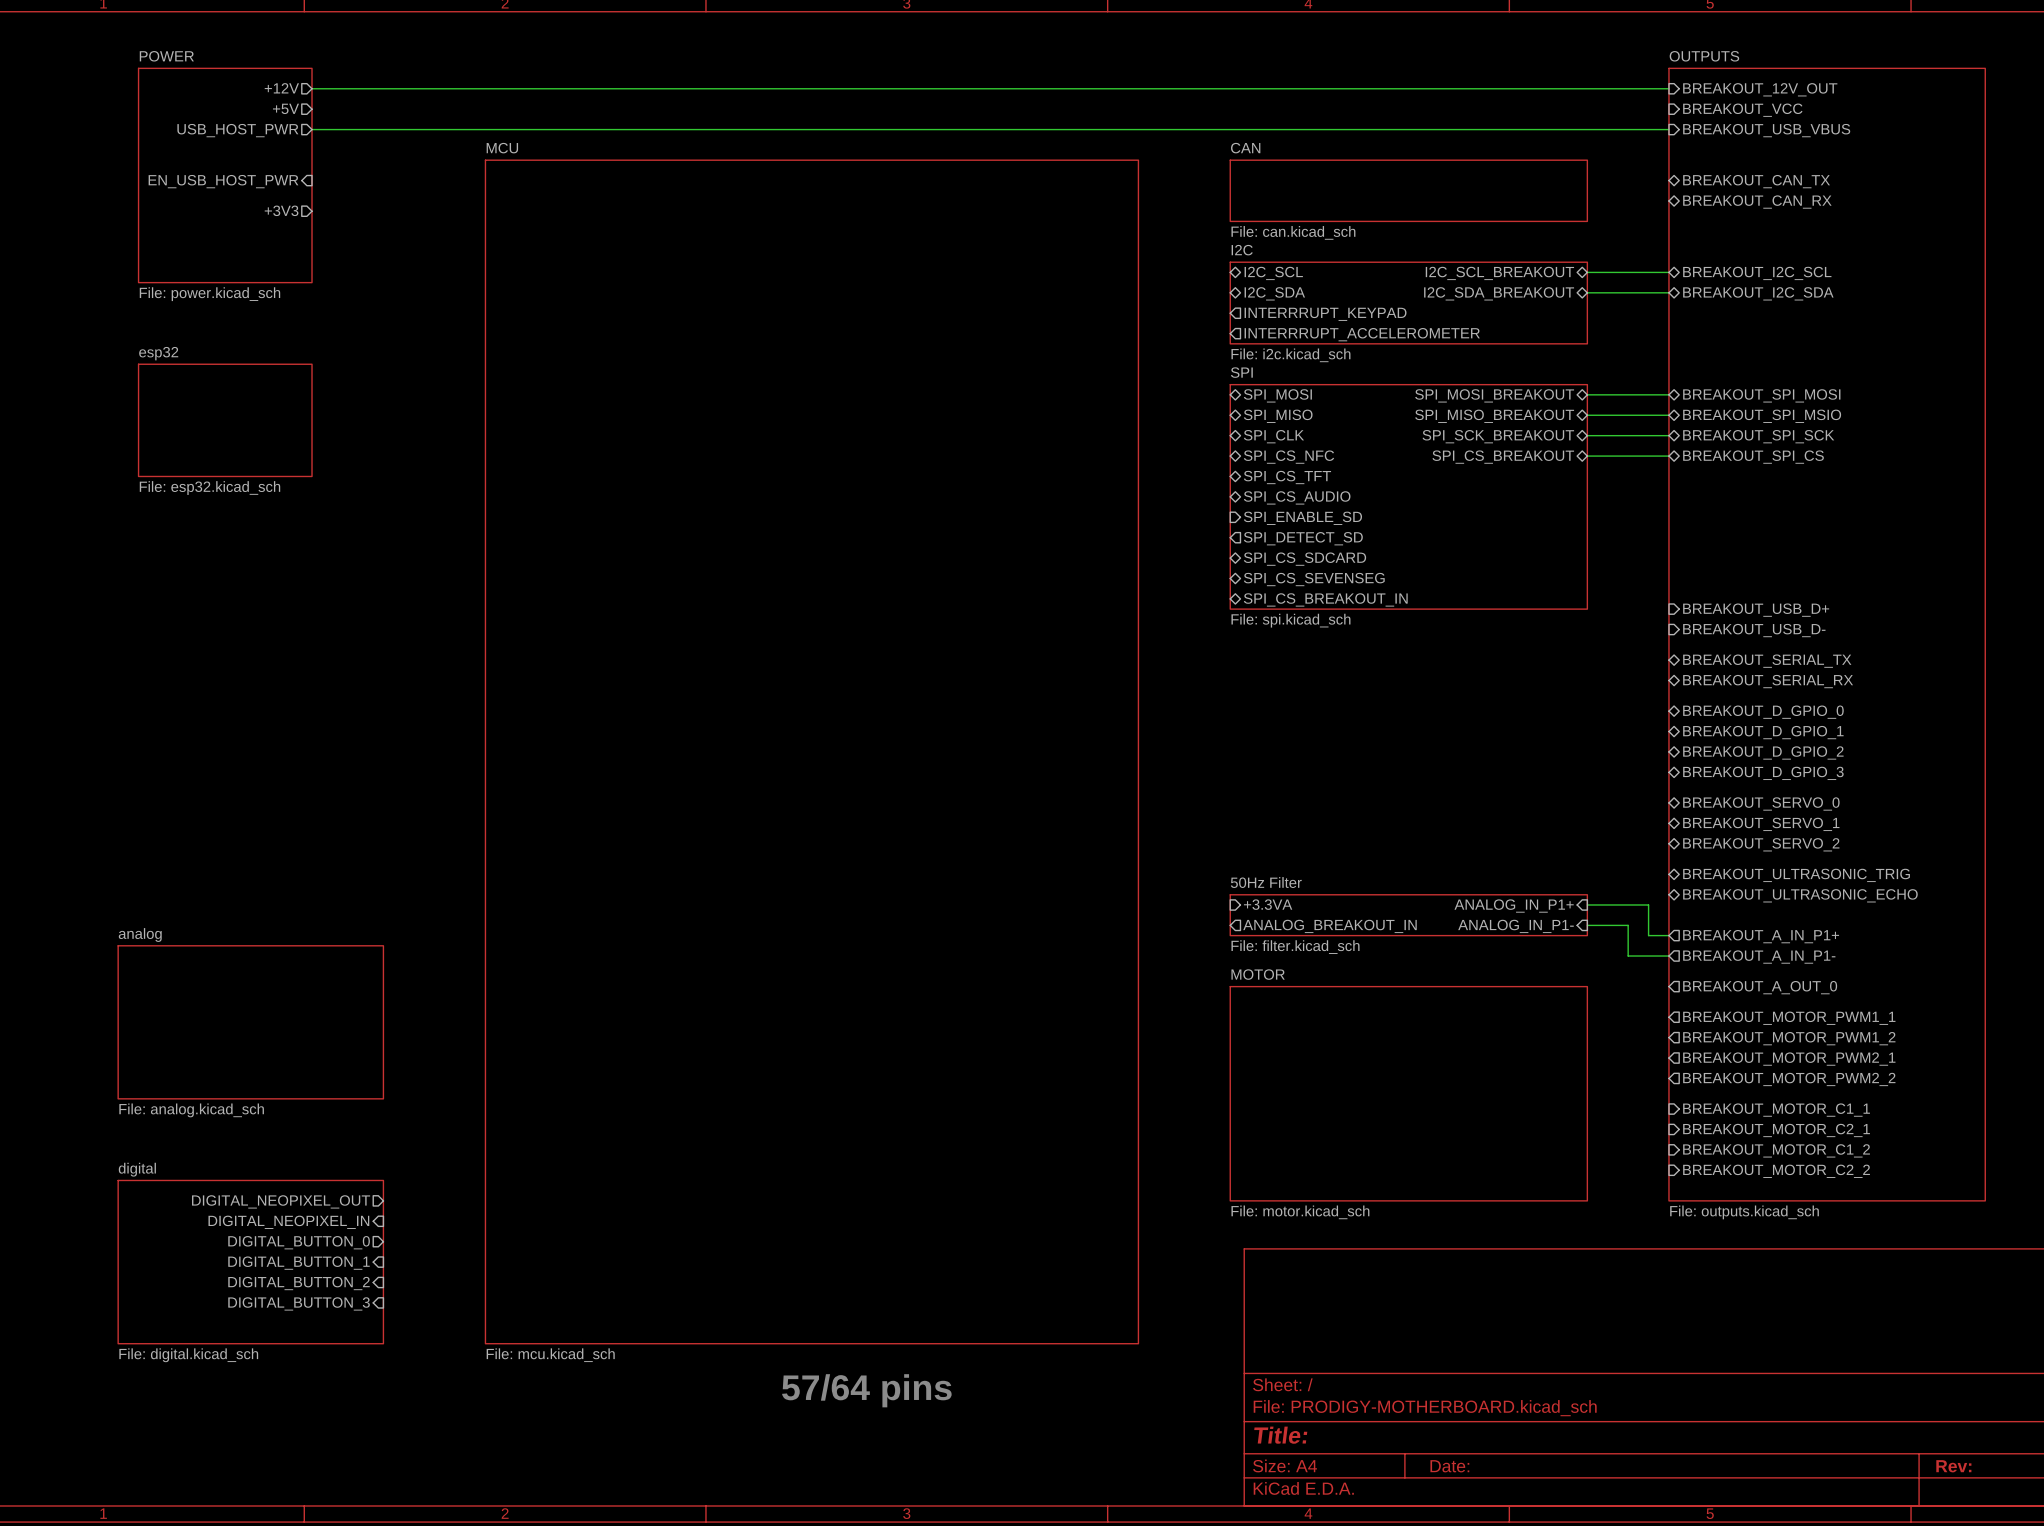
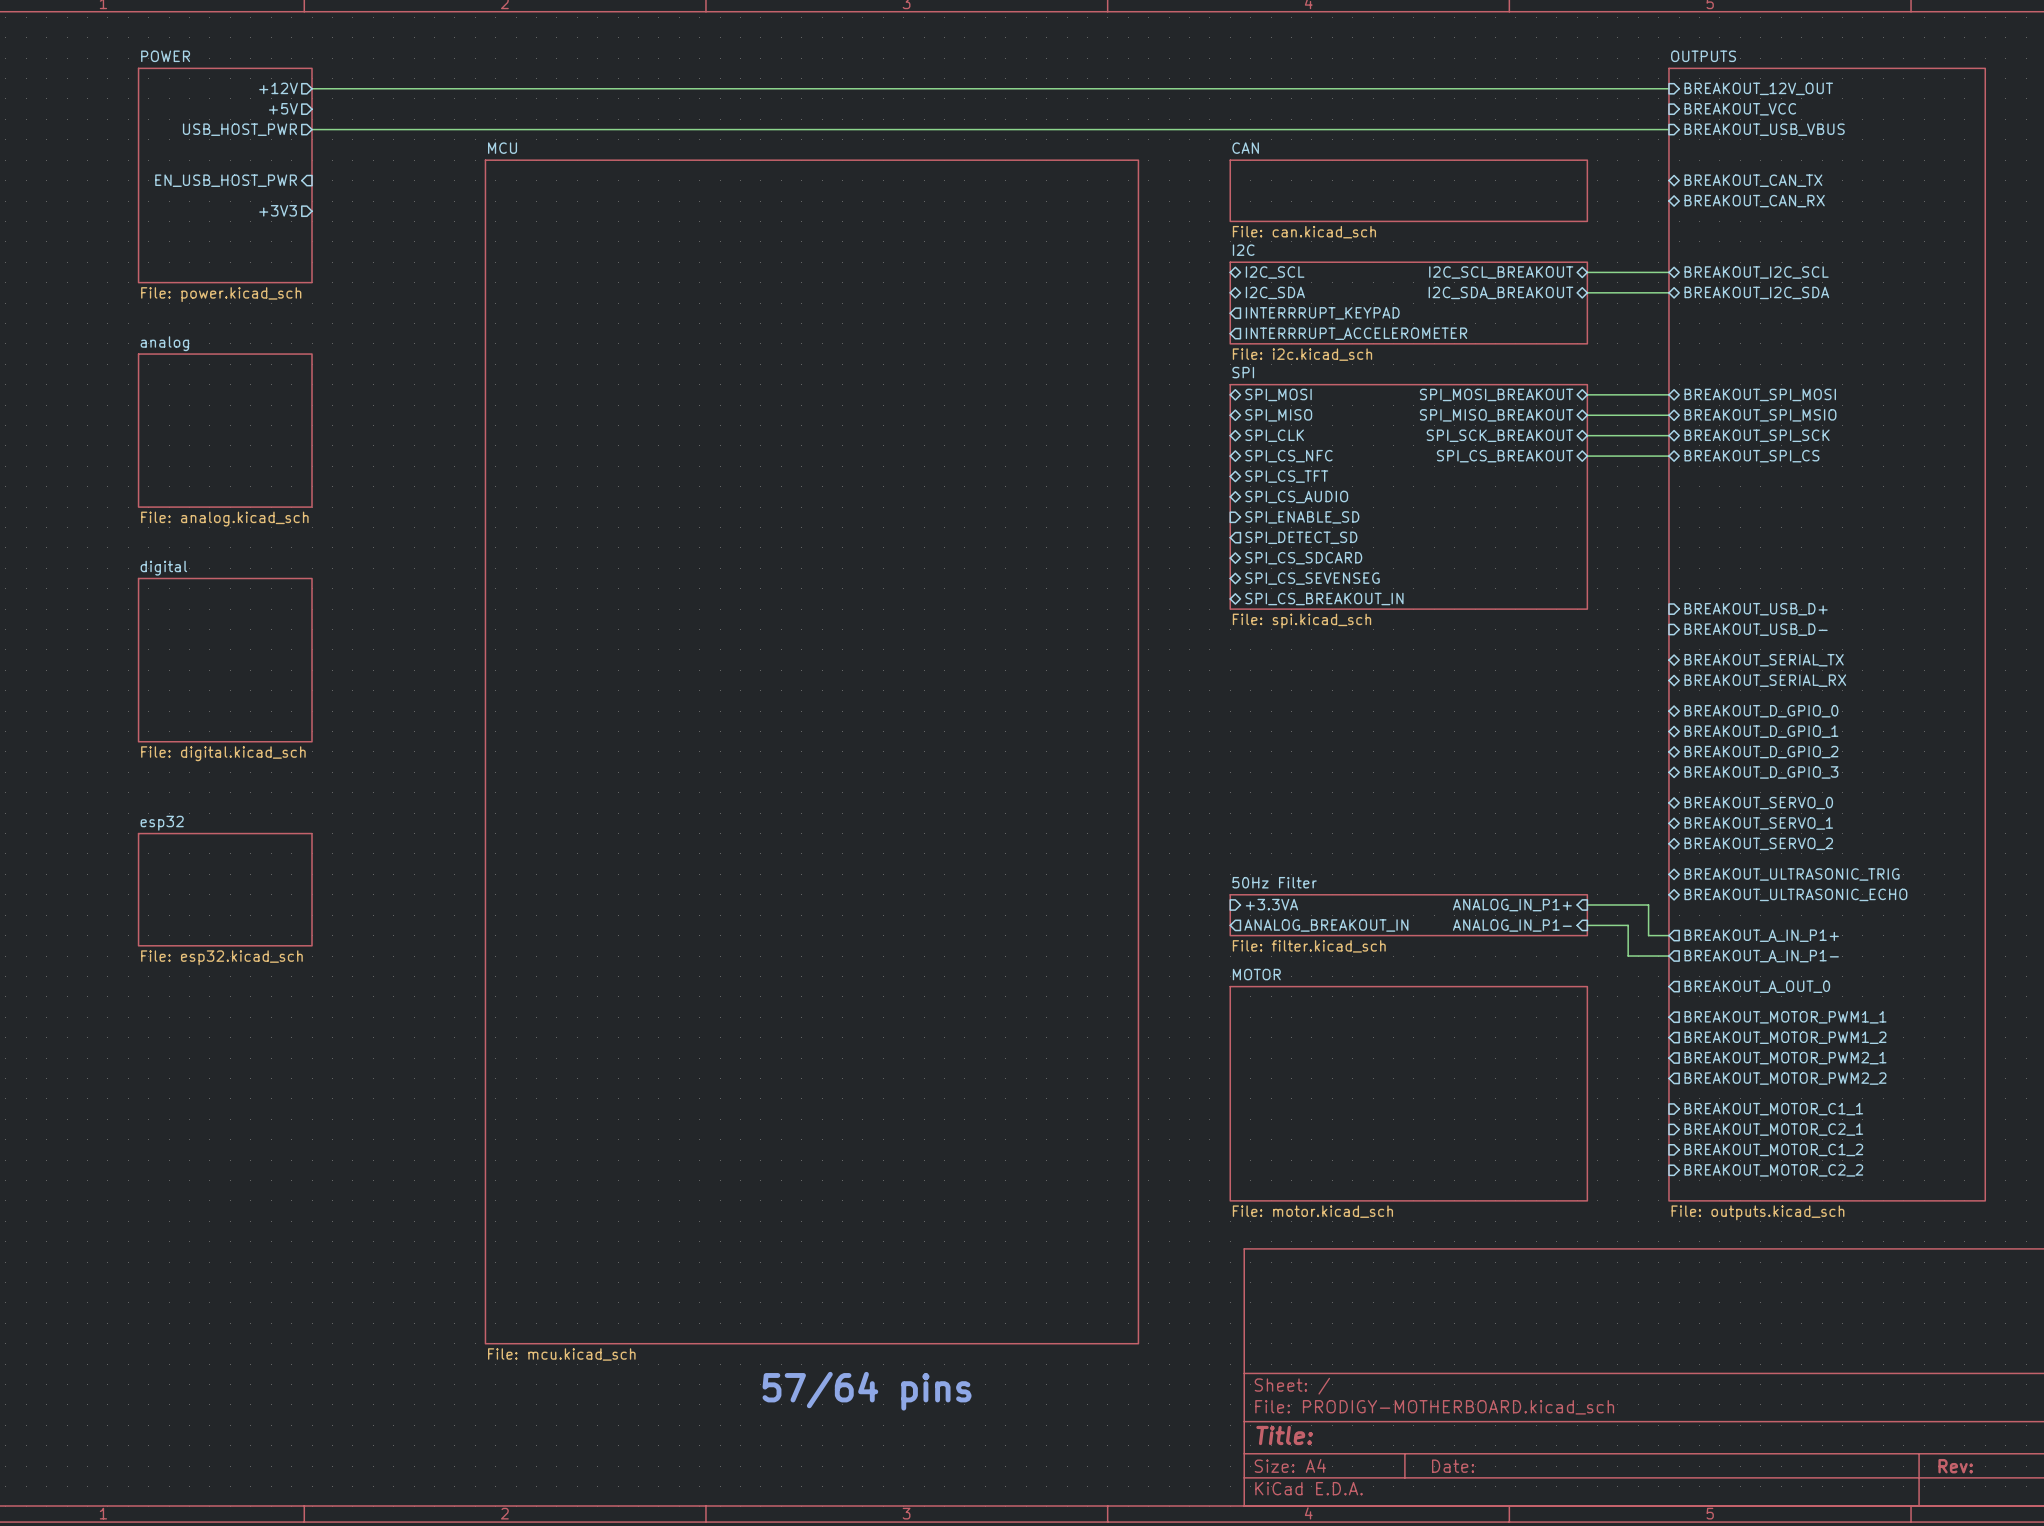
sheet esp32 position: (225, 420) -> (225, 889)
sheet analog: none -> File: analog.kicad_sch (225, 430)
sheet digital: none -> File: digital.kicad_sch (225, 660)
sheet analog: File: analog.kicad_sch (250, 1022) -> none
sheet pin: DIGITAL_NEOPIXEL_OUT (281, 1201) -> none
sheet pin: DIGITAL_NEOPIXEL_IN (288, 1222) -> none
sheet pin: DIGITAL_BUTTON_0 (299, 1242) -> none
sheet digital: File: digital.kicad_sch (250, 1262) -> none
sheet pin: DIGITAL_BUTTON_1 (299, 1263) -> none
sheet pin: DIGITAL_BUTTON_2 (299, 1283) -> none
sheet pin: DIGITAL_BUTTON_3 (299, 1303) -> none

